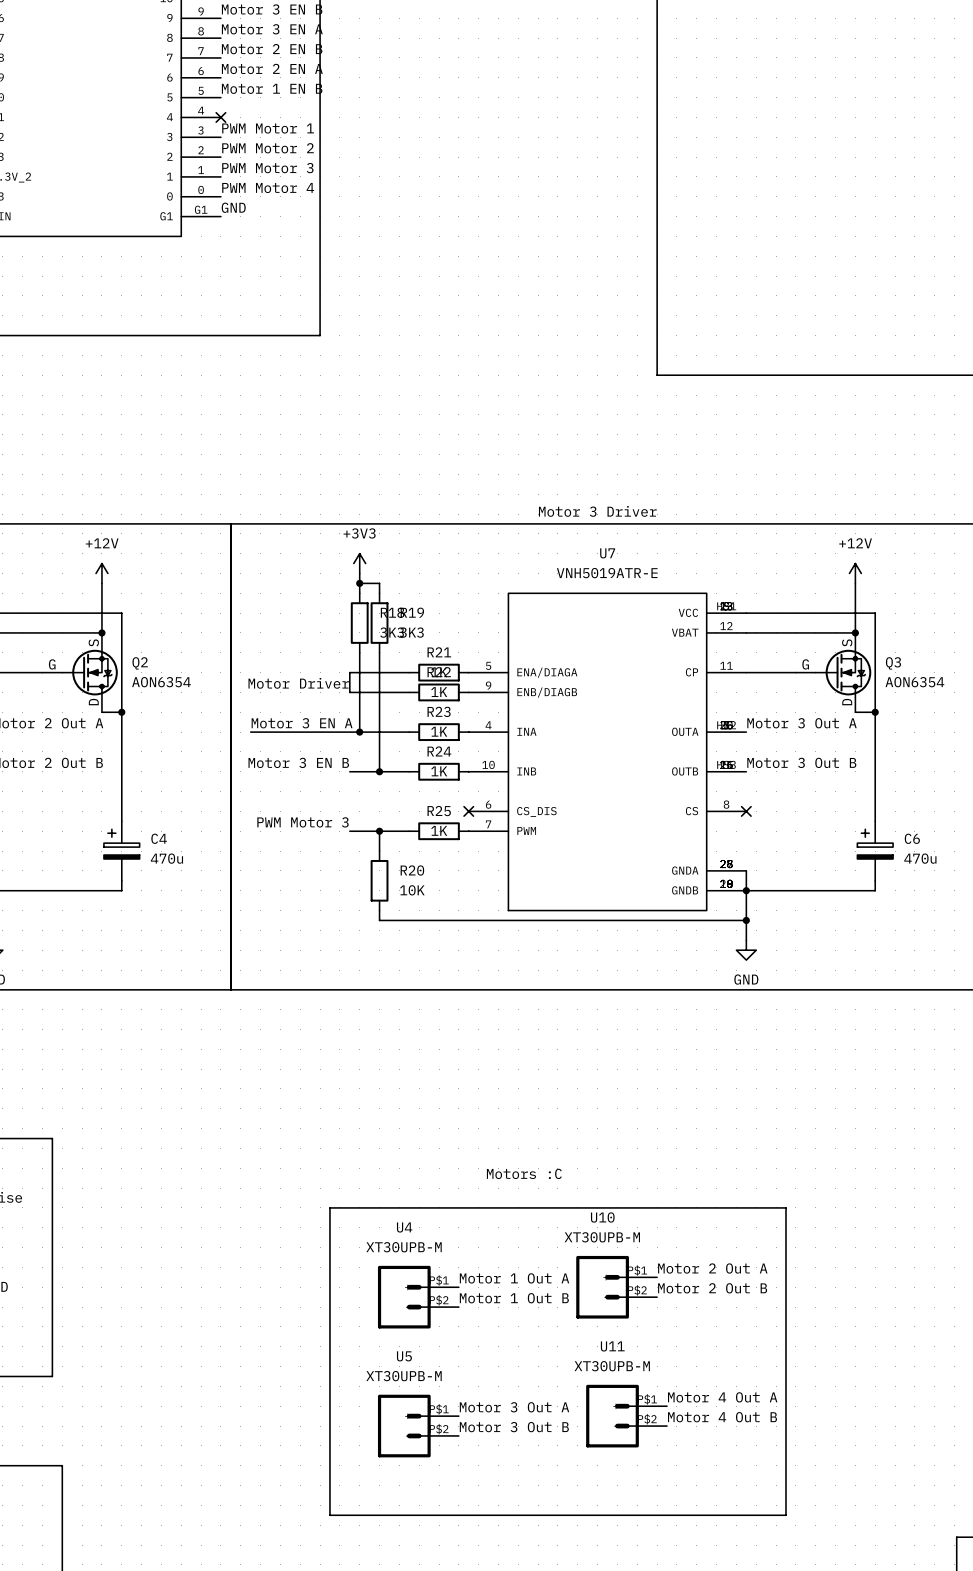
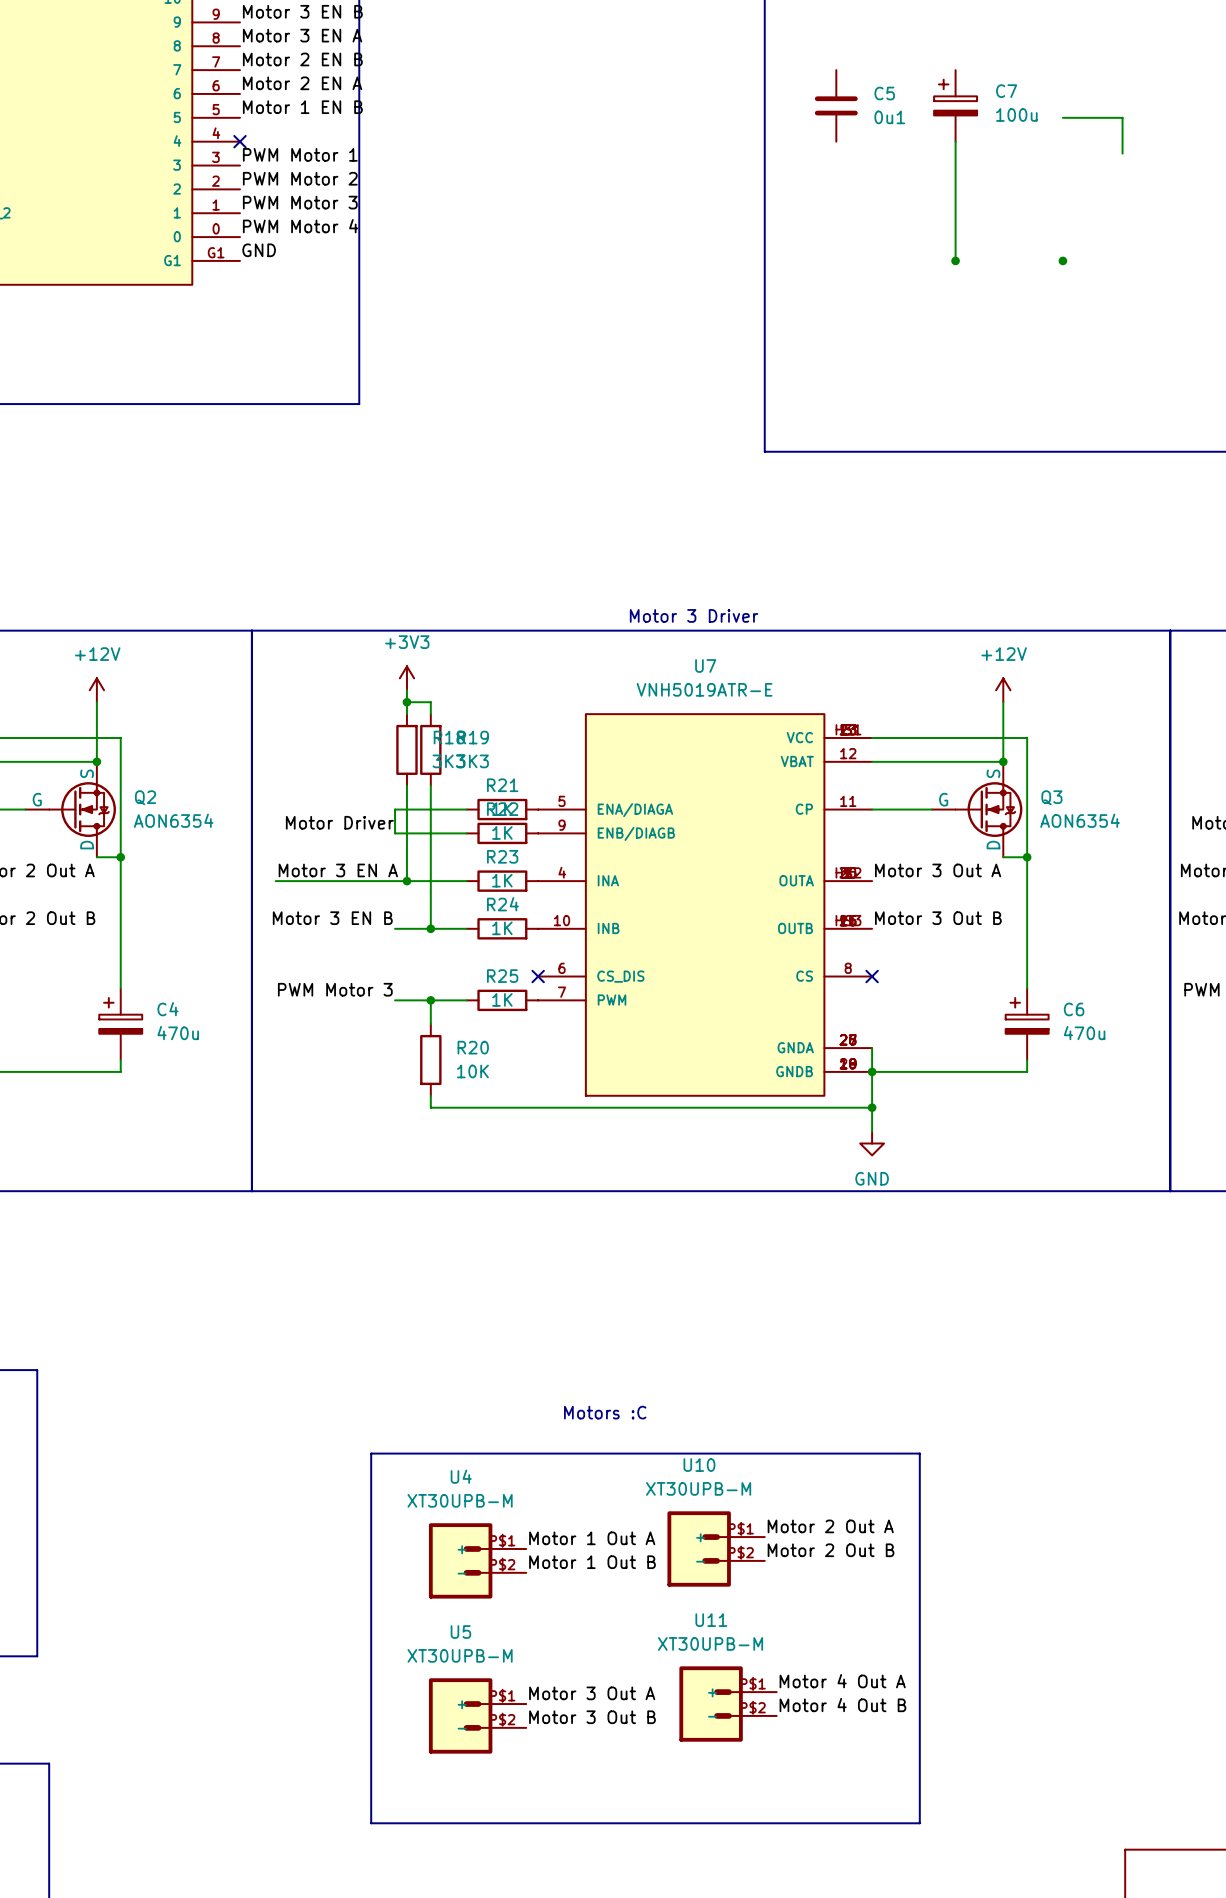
C5: none -> 0u1 (836, 105)
C7: none -> 100u (955, 105)
wire: none -> (1062, 117) (1122, 117) (1122, 153)
wire: none -> (955, 141) (955, 260)
junction: none -> (955, 260)
junction: none -> (1062, 260)

